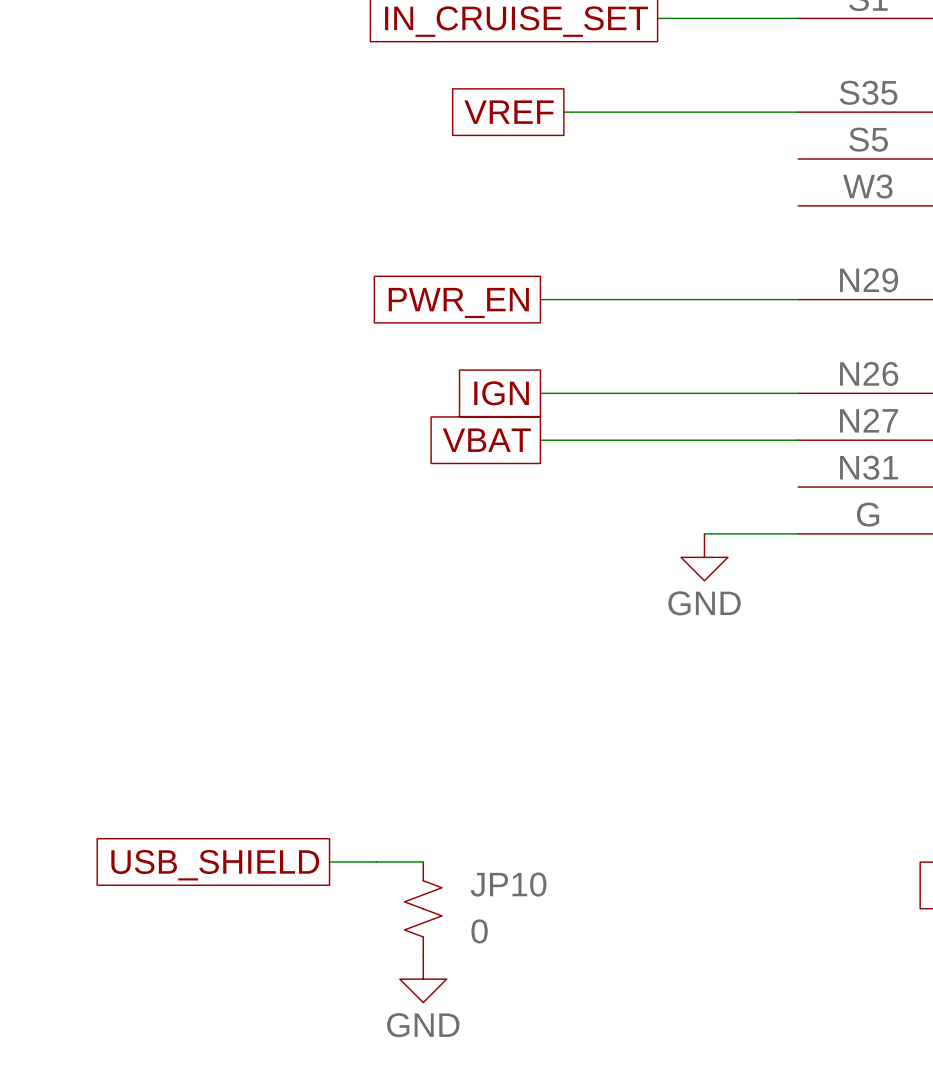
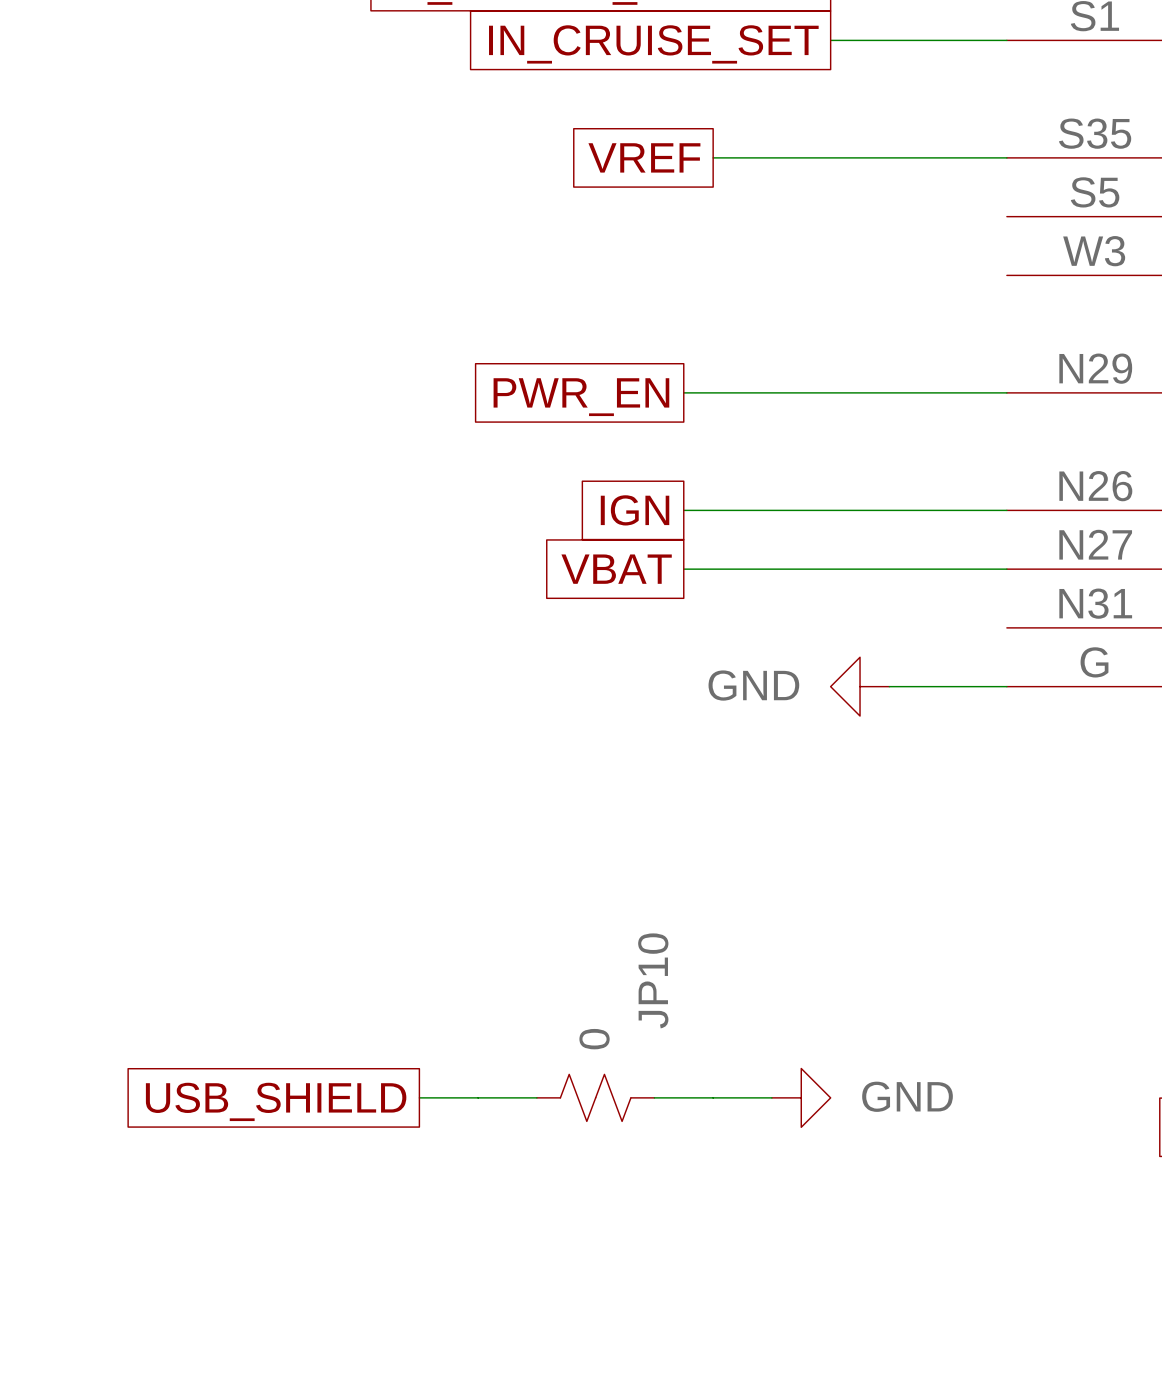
power symbol rotation: 0° (704, 557) -> 90° clockwise (860, 686)
power symbol position: GND (704, 557) -> GND (860, 686)
power symbol text position: GND (704, 603) -> GND (753, 685)
wire: none -> (654, 1097) (771, 1097)
power symbol: none -> GND (801, 1097)
JP10 name position: JP10 (508, 884) -> JP10 (653, 980)
JP10 rotation: 0° (423, 908) -> 90° clockwise (595, 1097)
JP10 position: (423, 908) -> (595, 1097)
JP10 value position: 0 (479, 931) -> 0 (594, 1039)
power symbol: GND (423, 979) -> none

